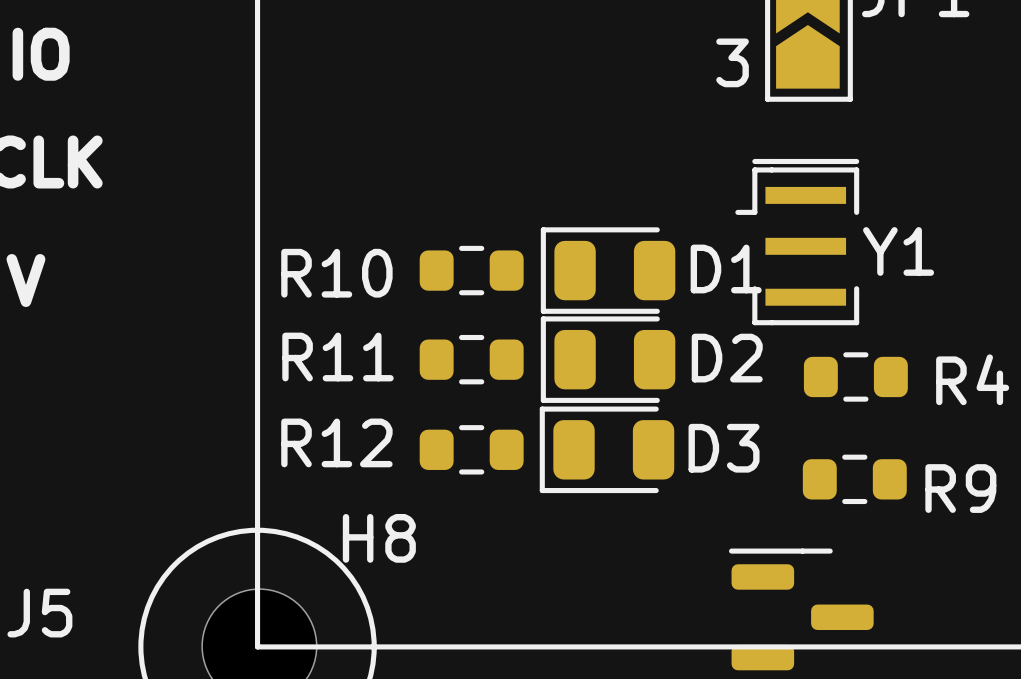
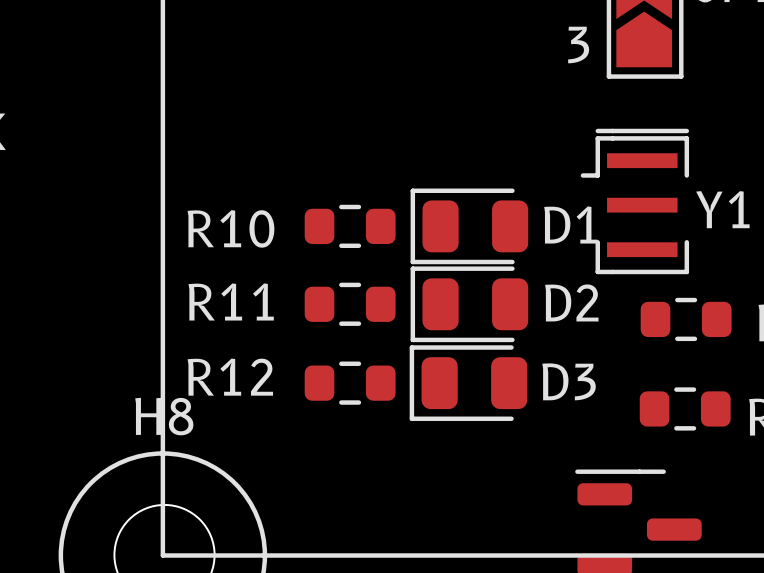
H8 name position: H8 (379, 538) -> H8 (164, 416)

